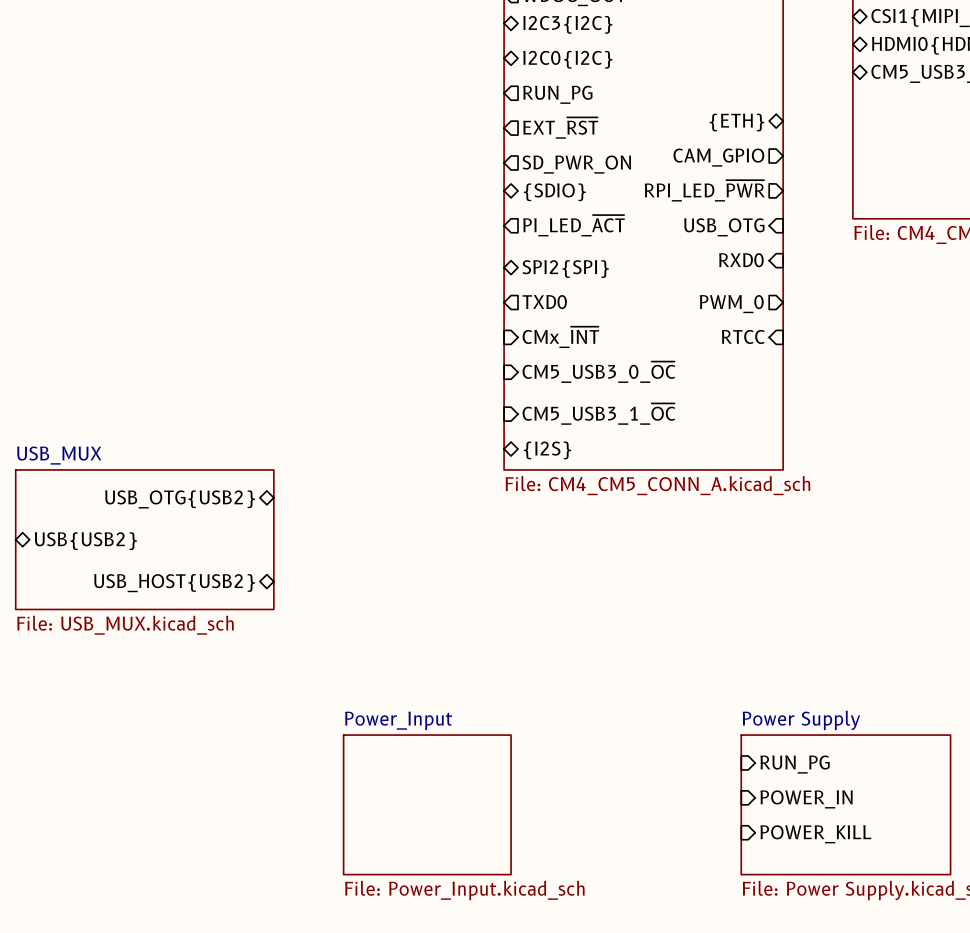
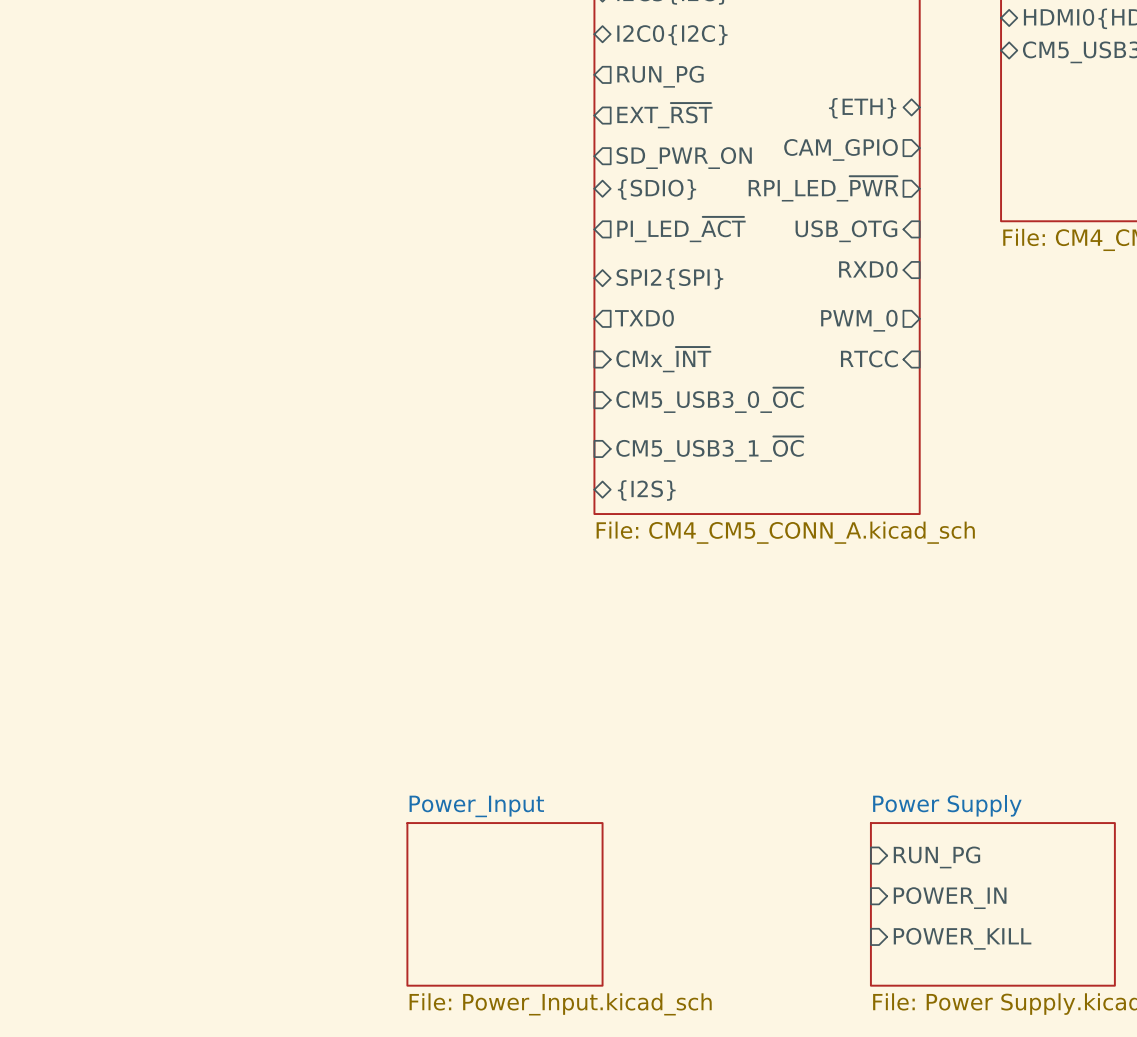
sheet pin: USB_OTG{USB2} (180, 499) -> none
sheet USB_MUX: File: USB_MUX.kicad_sch (144, 539) -> none
sheet pin: USB{USB2} (85, 541) -> none
sheet pin: USB_HOST{USB2} (174, 583) -> none

